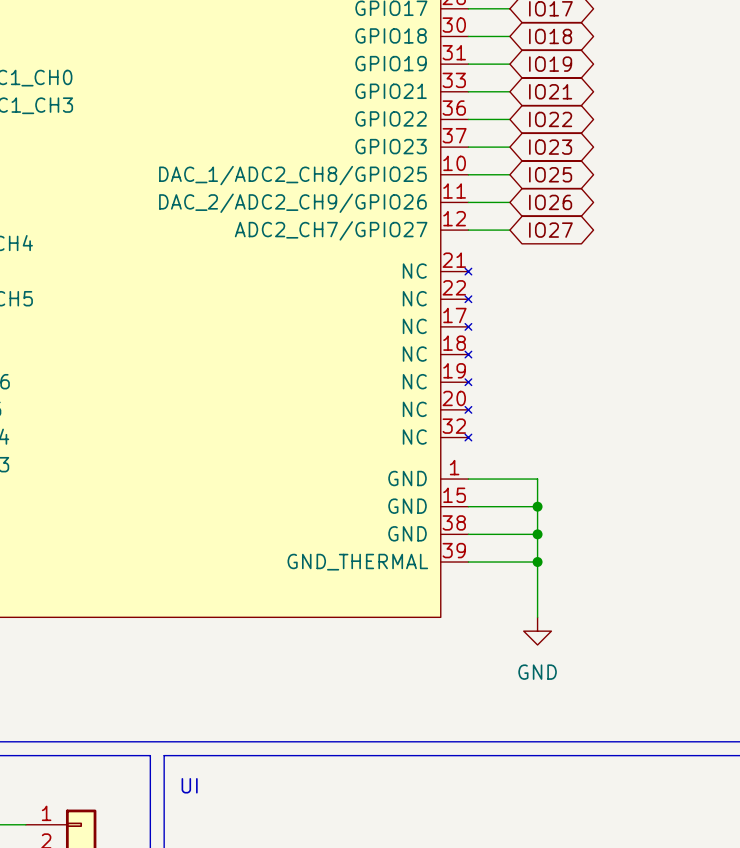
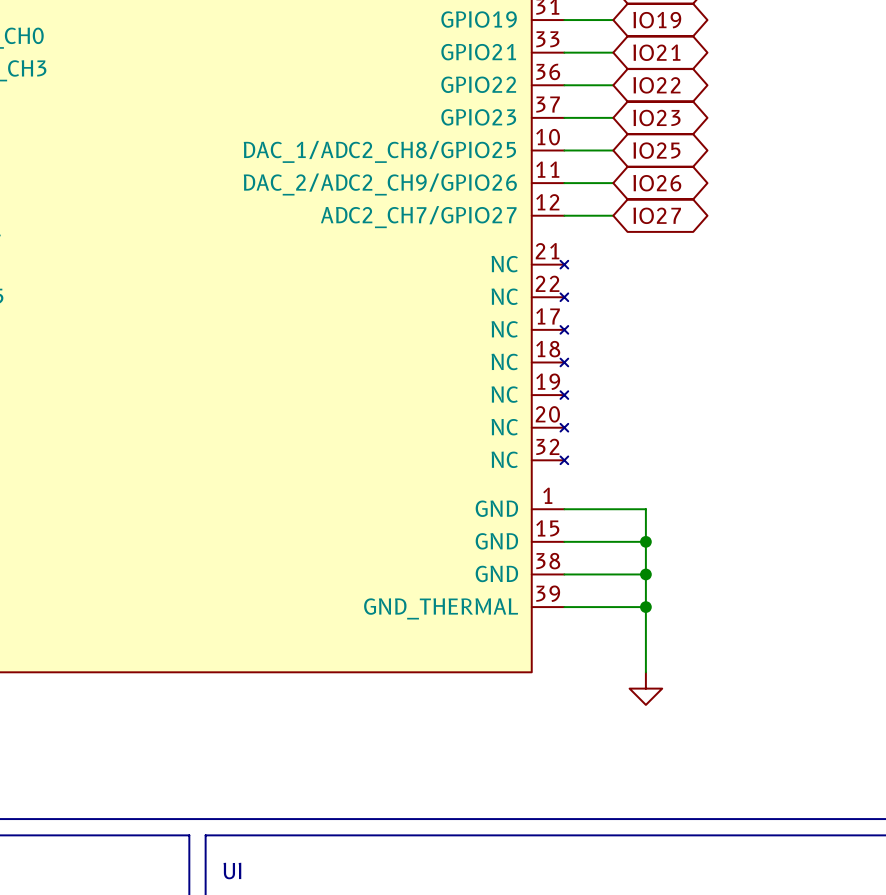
power symbol text: GND (537, 672) -> none

